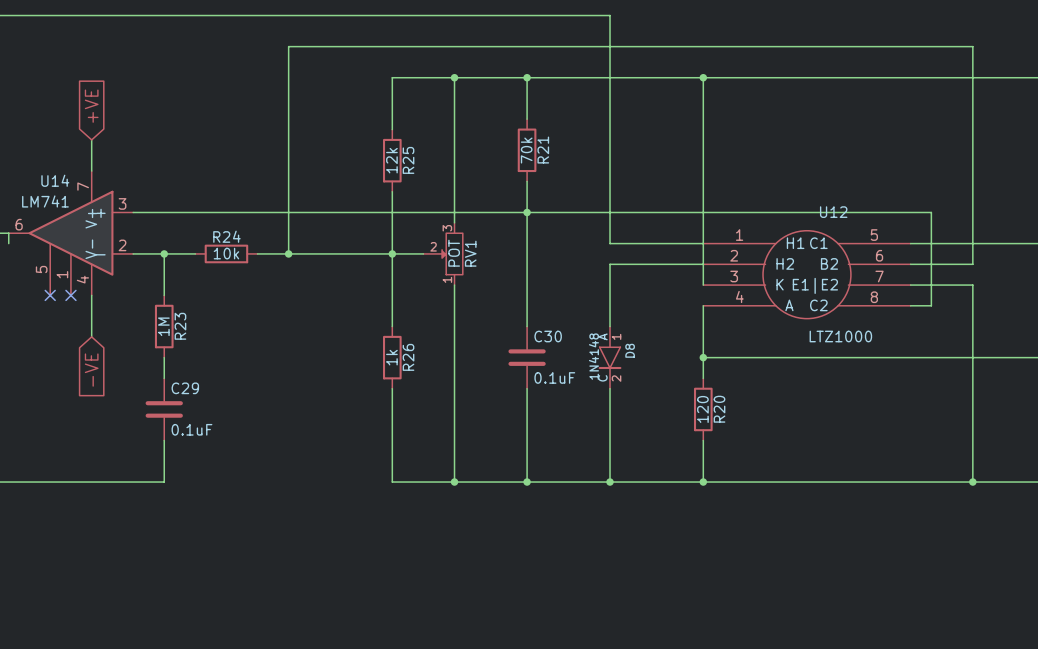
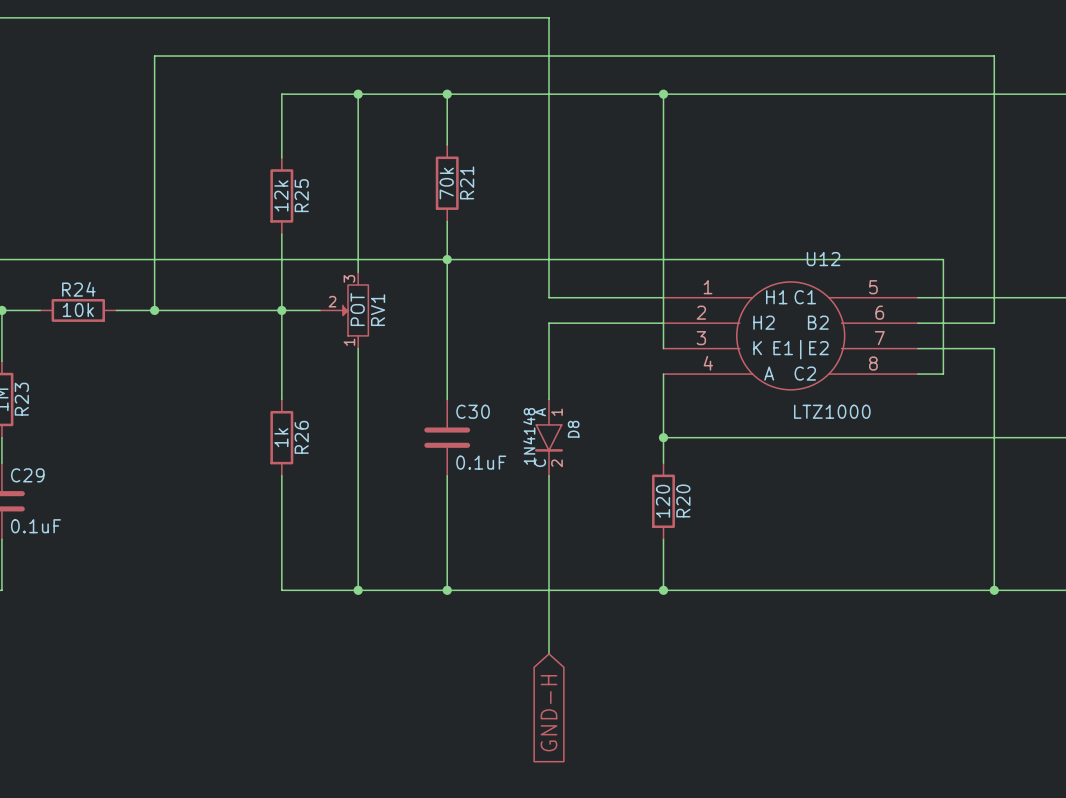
wire: none -> (549, 590) (549, 653)
junction: (610, 482) -> none
global label: none -> GND-H (549, 713)

